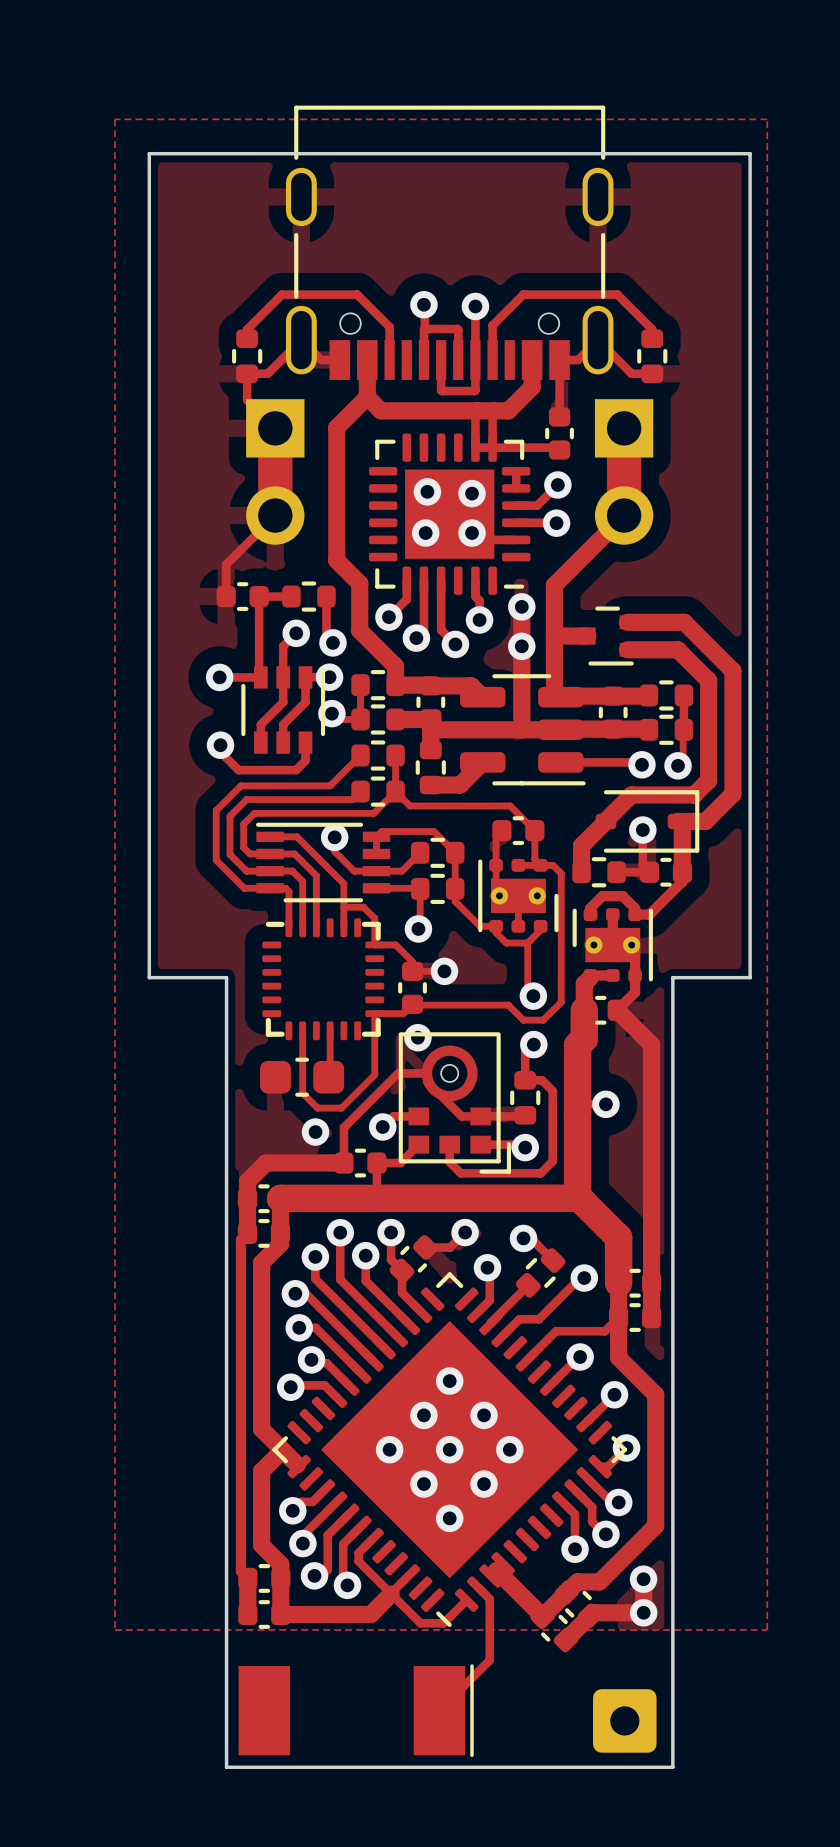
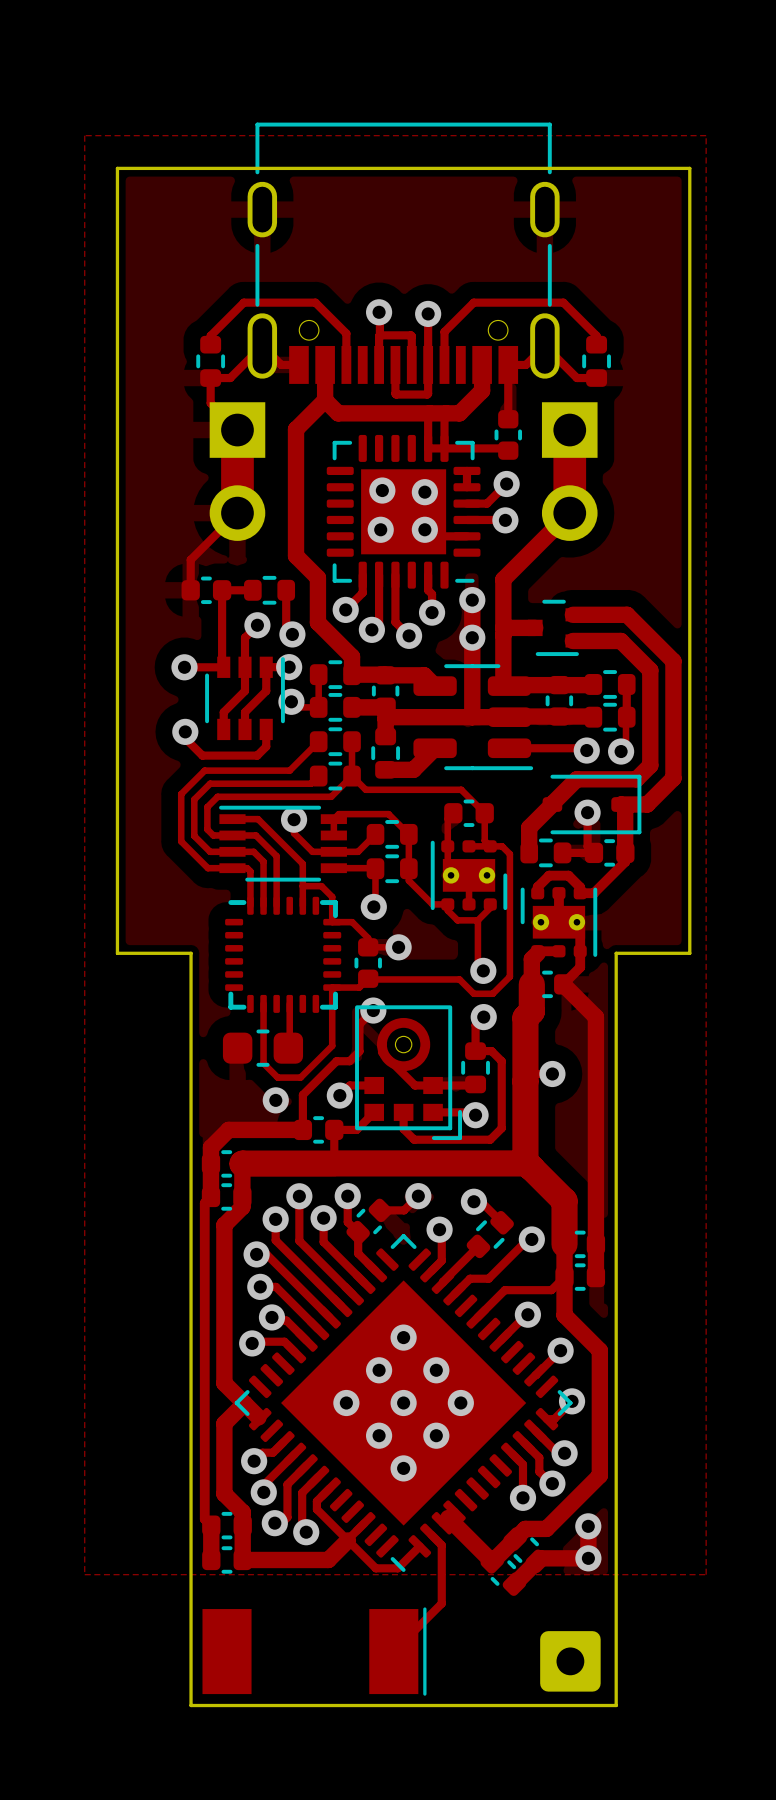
track: (426, 1073) (398, 1073) (343, 1127) -> (373, 1010) (359, 1024) (359, 1051) (349, 1061) (336, 1061) (302, 1096)

